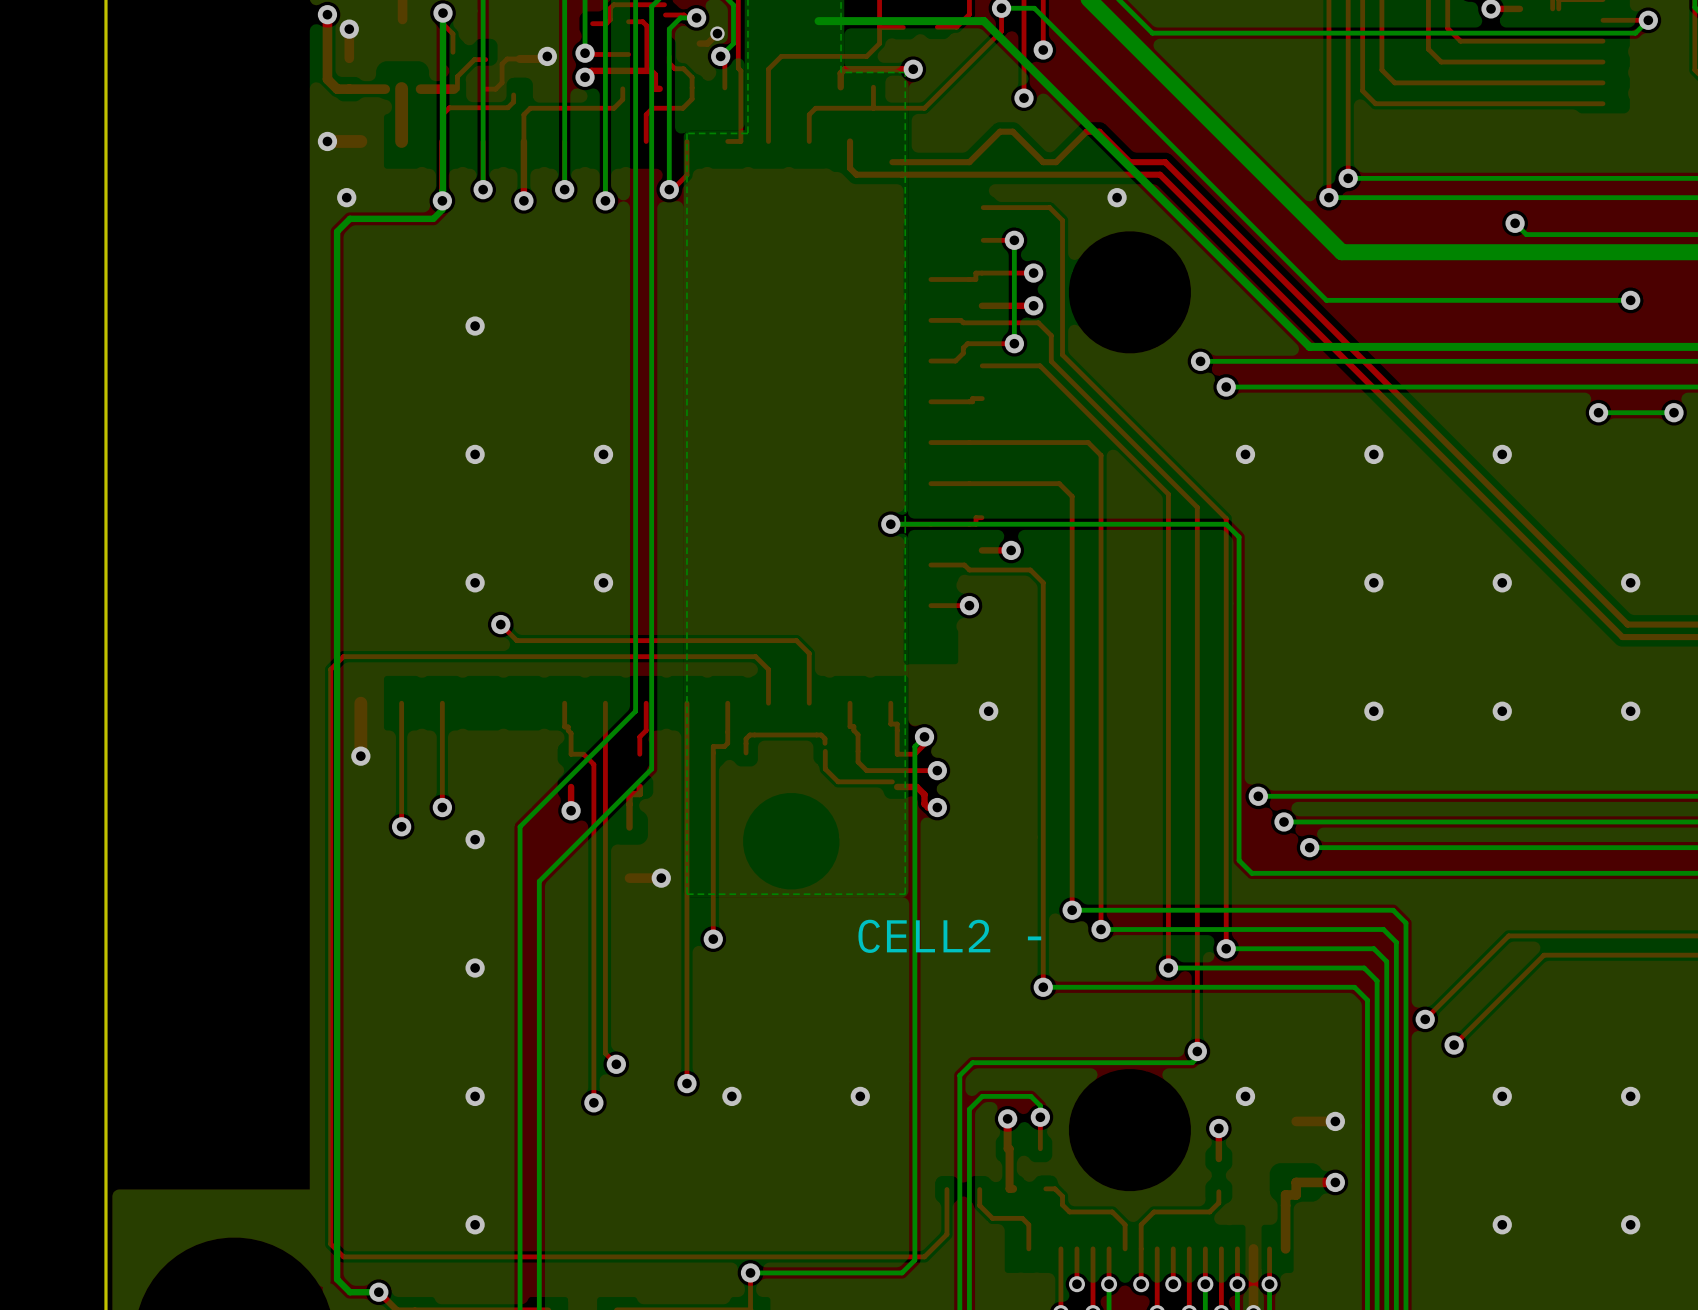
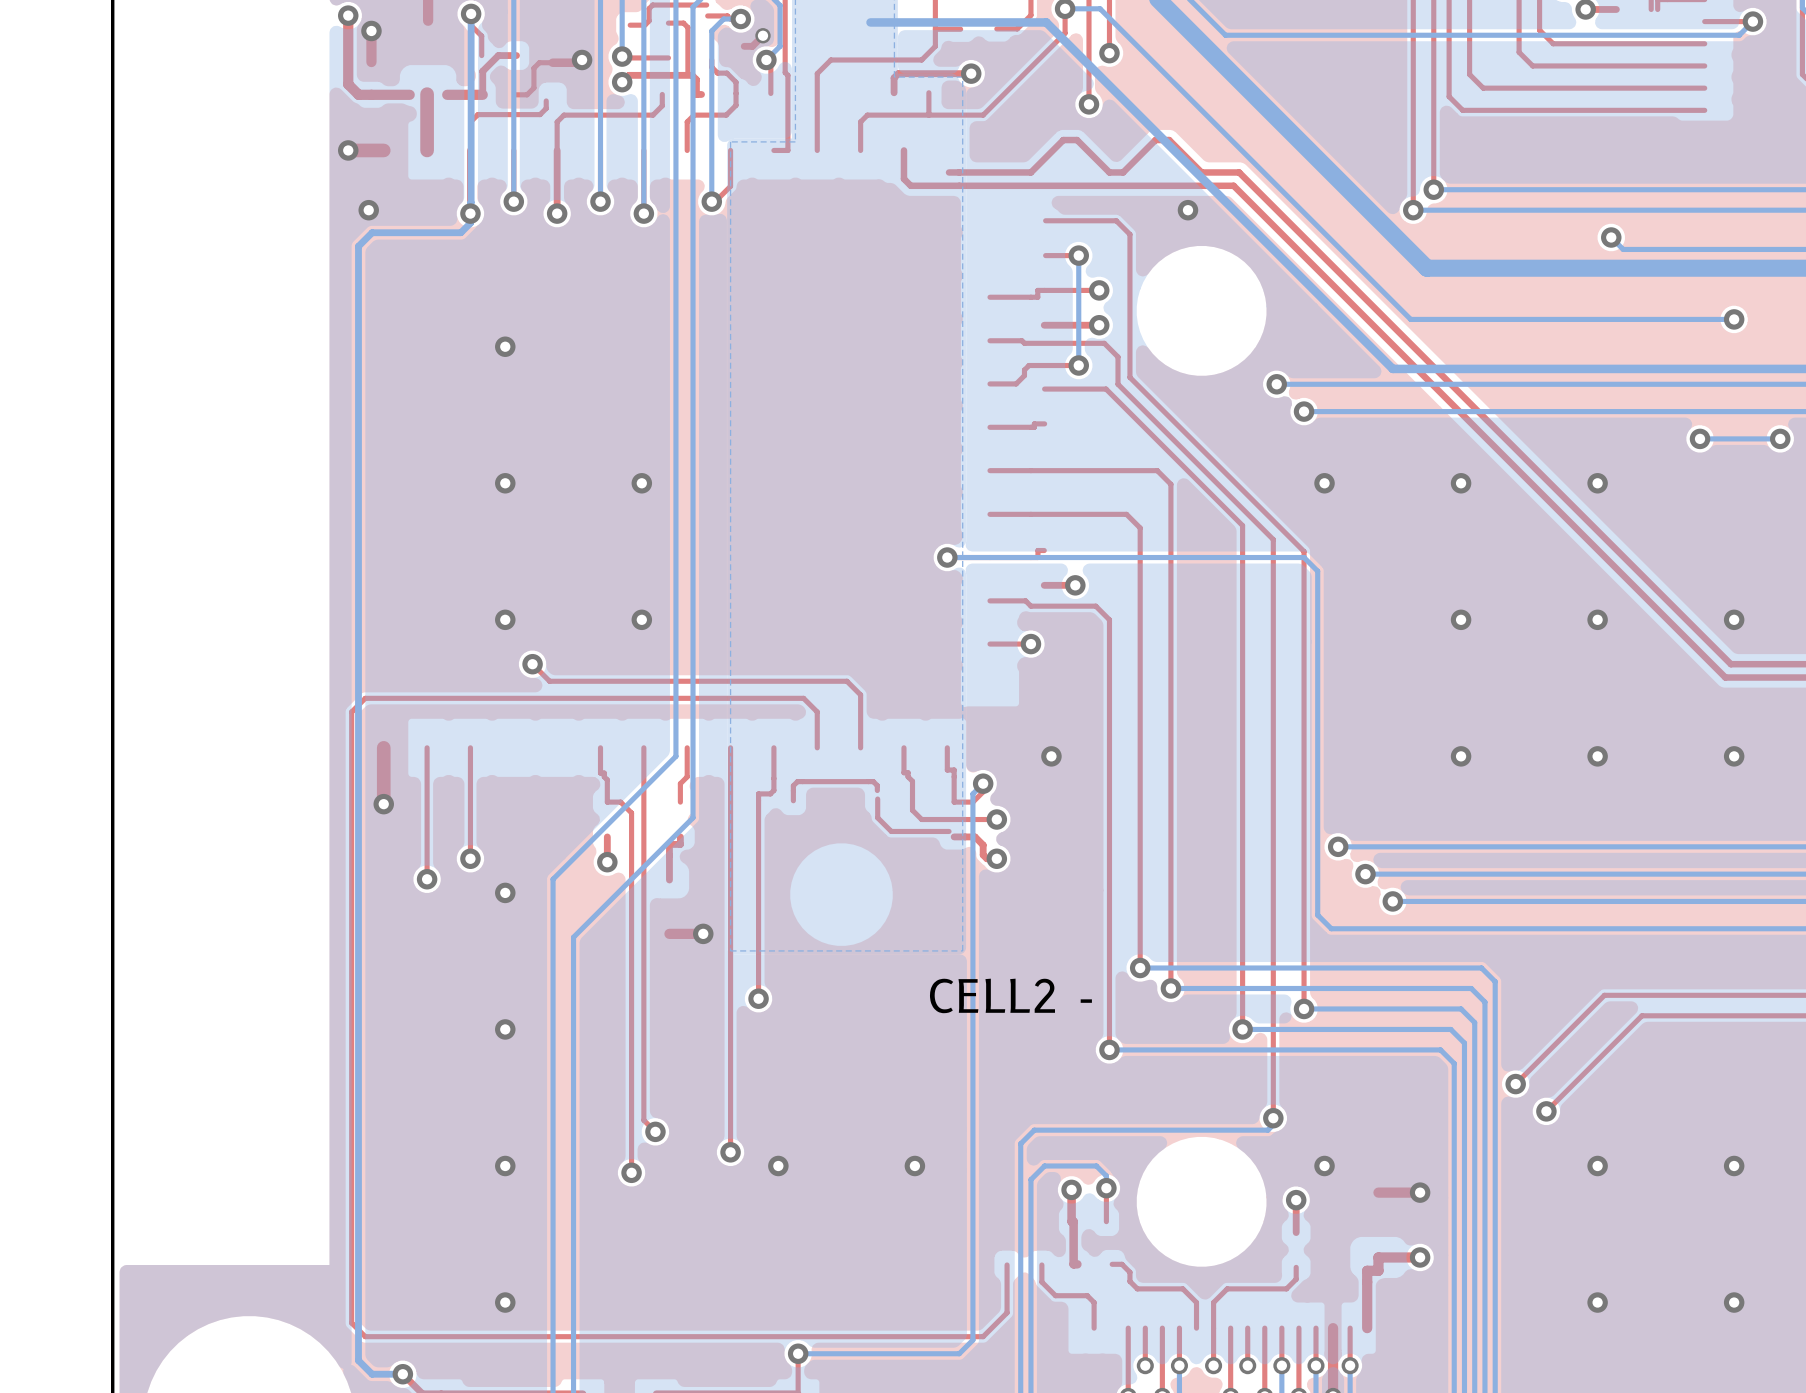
top track: none -> (516, 55) (498, 55) (482, 71) (482, 94)
top track: (485, 59) (474, 59) (457, 76) (457, 89) -> none

